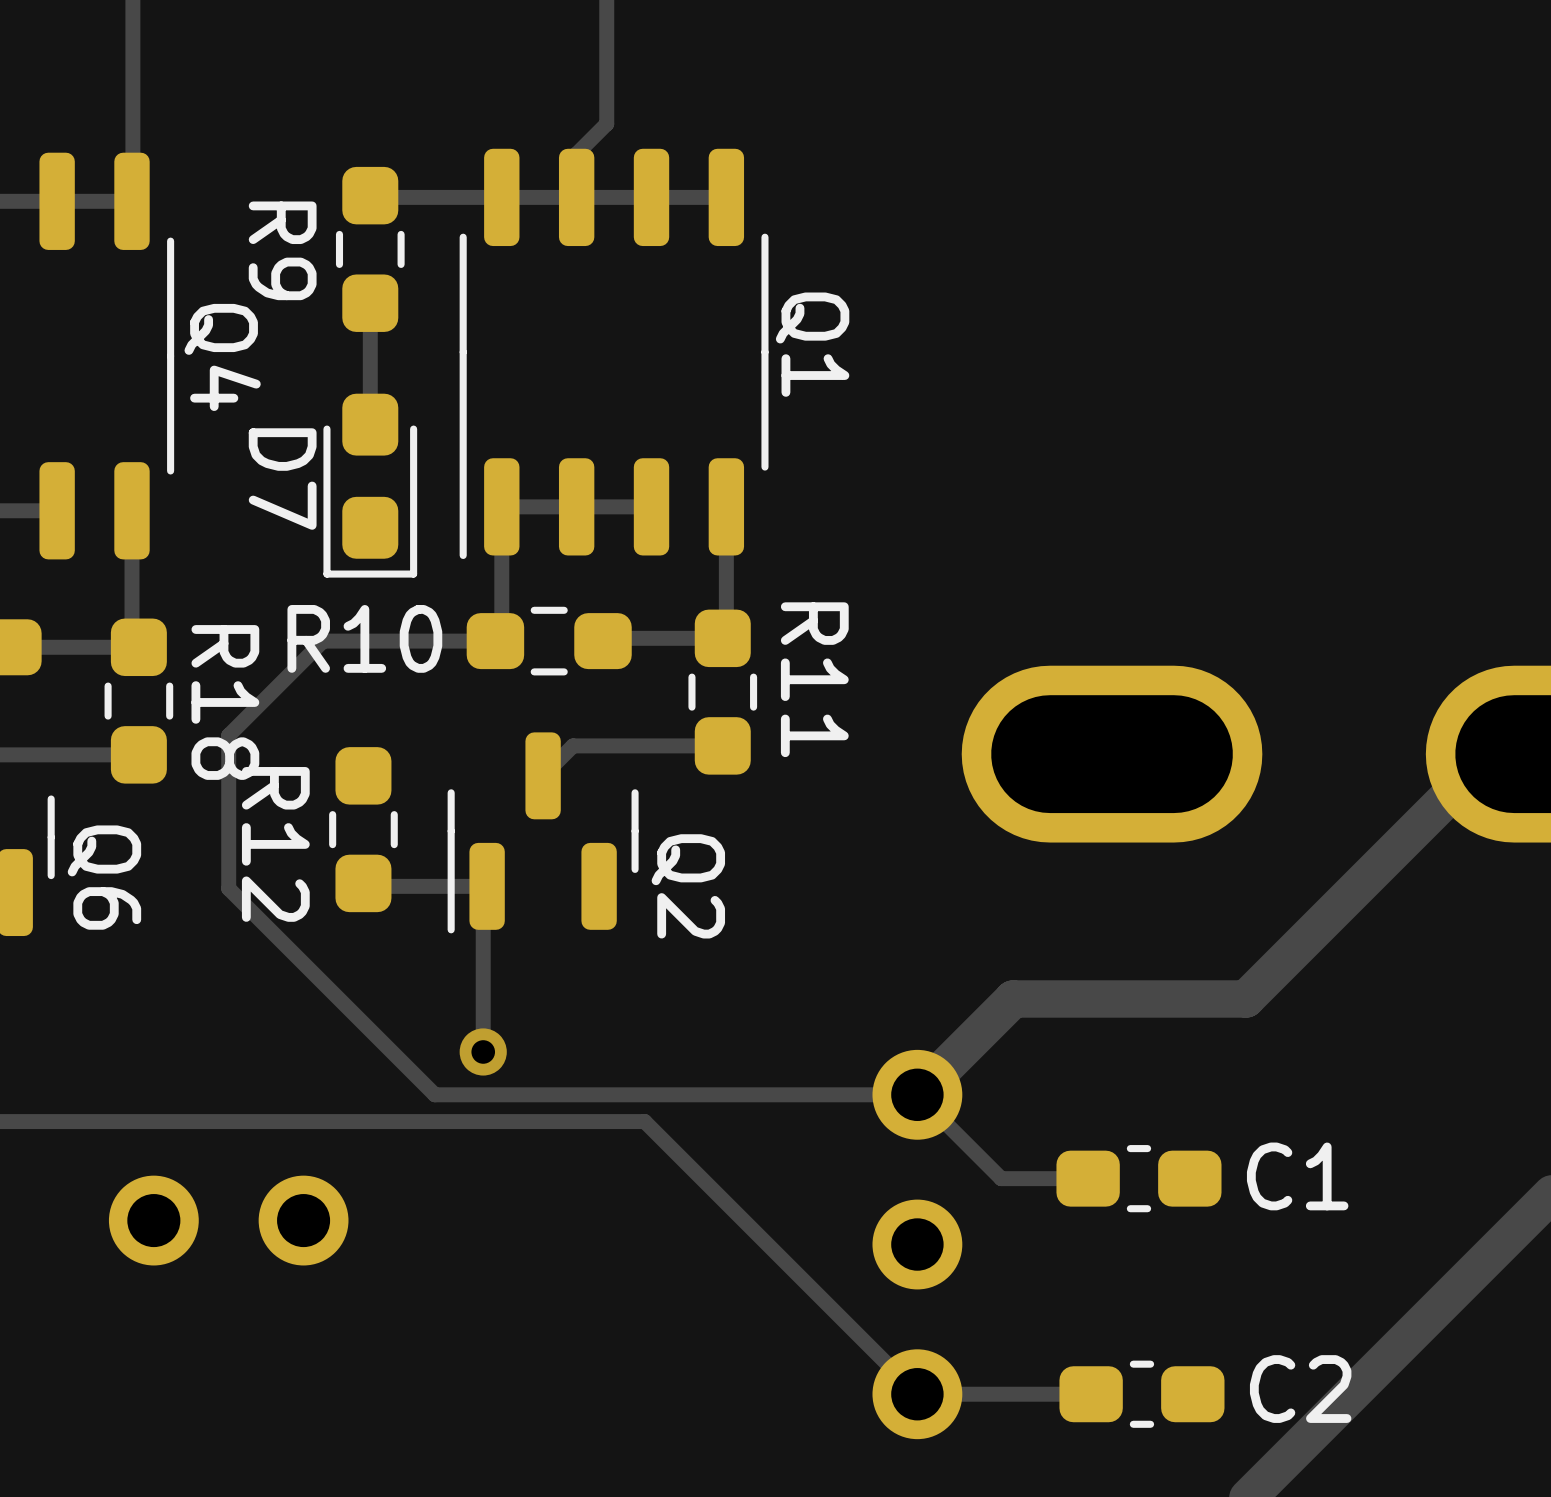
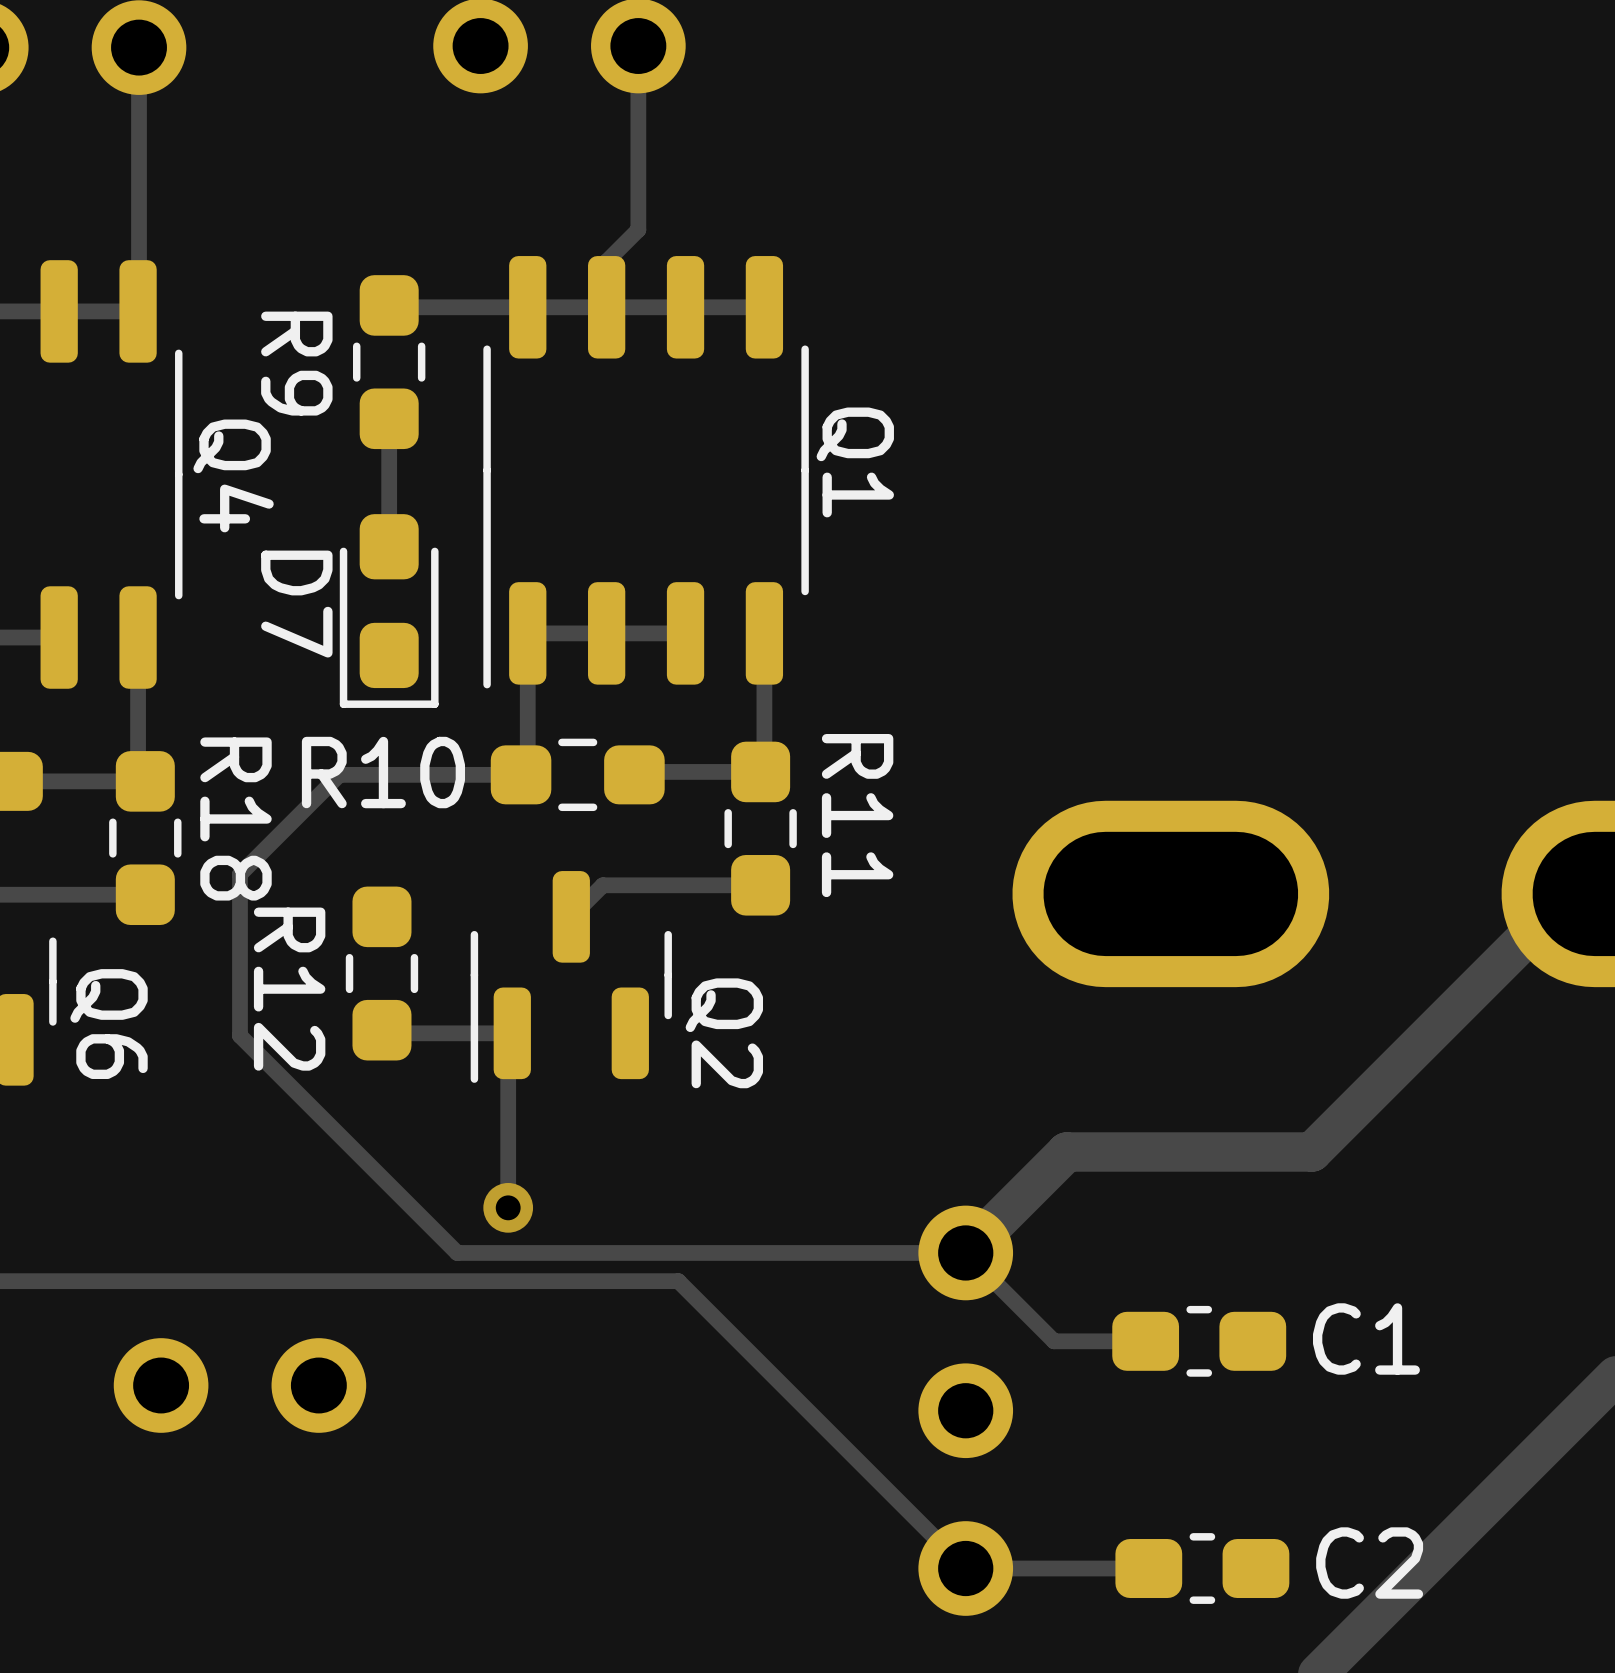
R18 name position: R18 (225, 702) -> R18 (235, 818)

